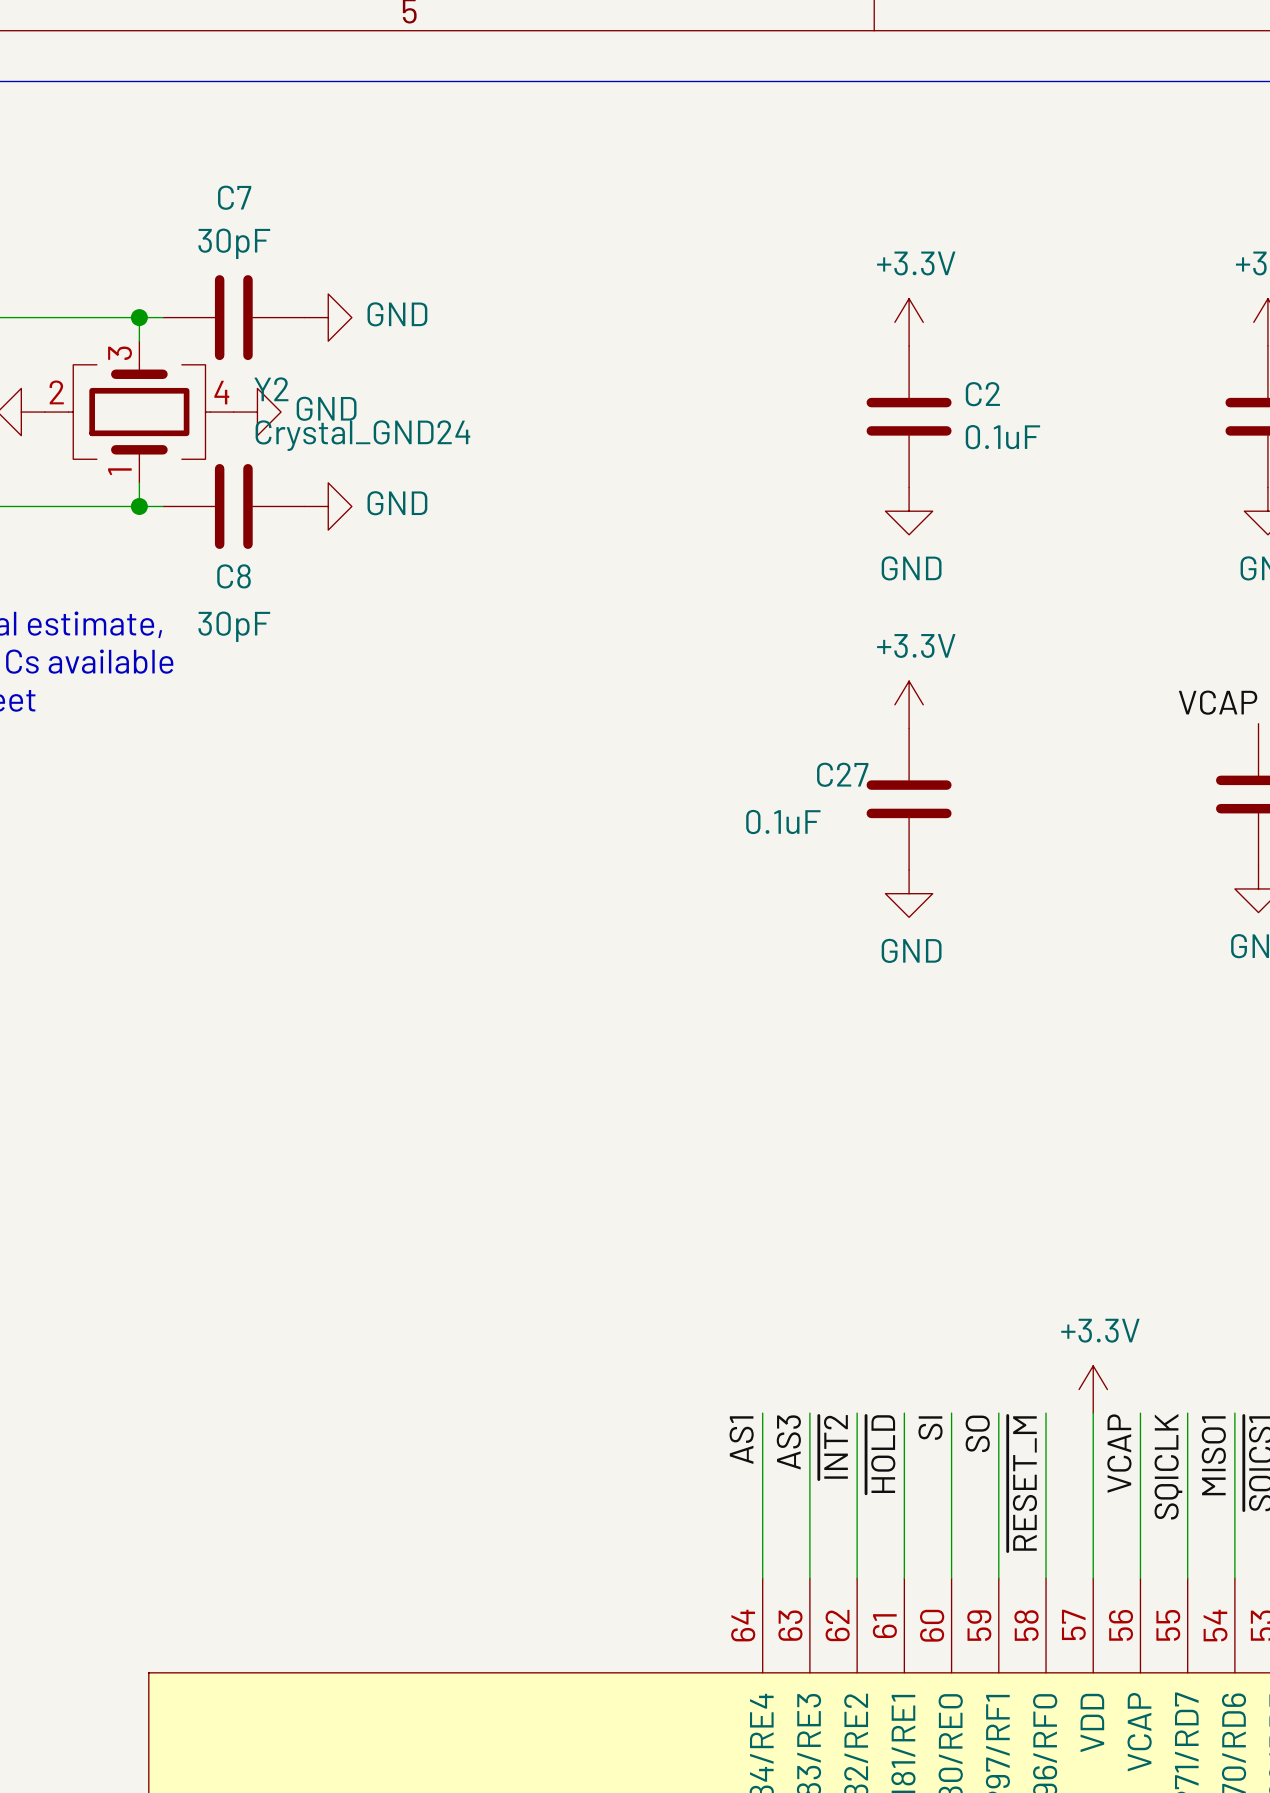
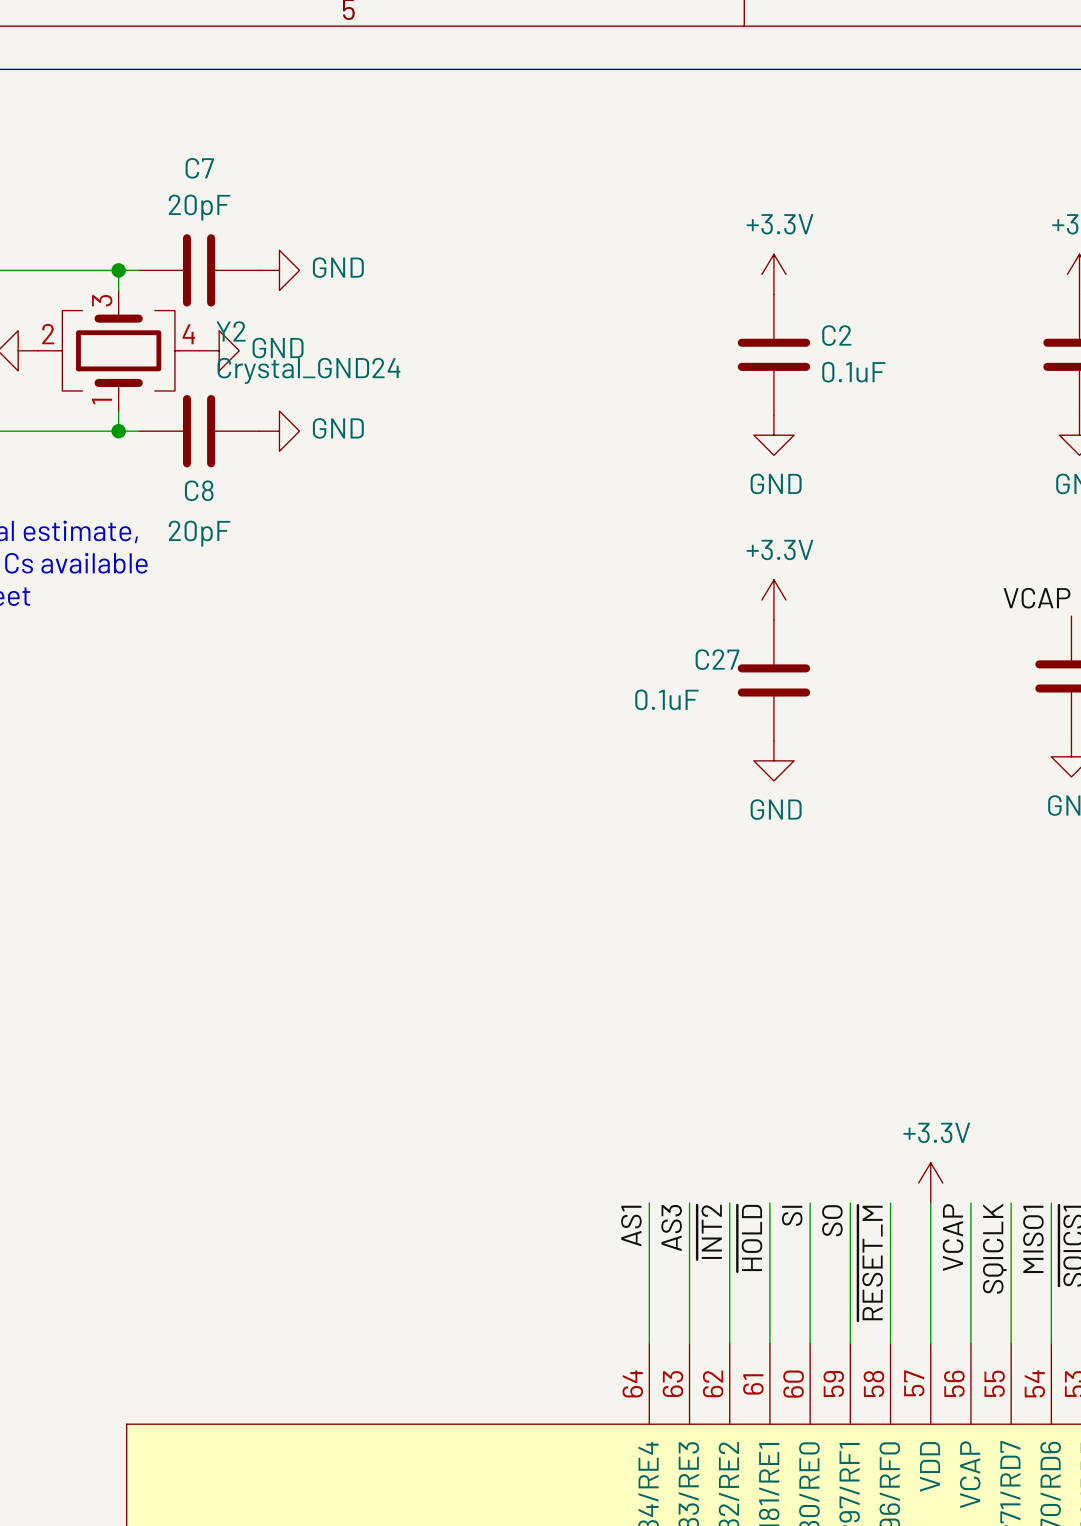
C7 value: 30pF (234, 243) -> 20pF (199, 207)
C8 value: 30pF (234, 626) -> 20pF (199, 533)

